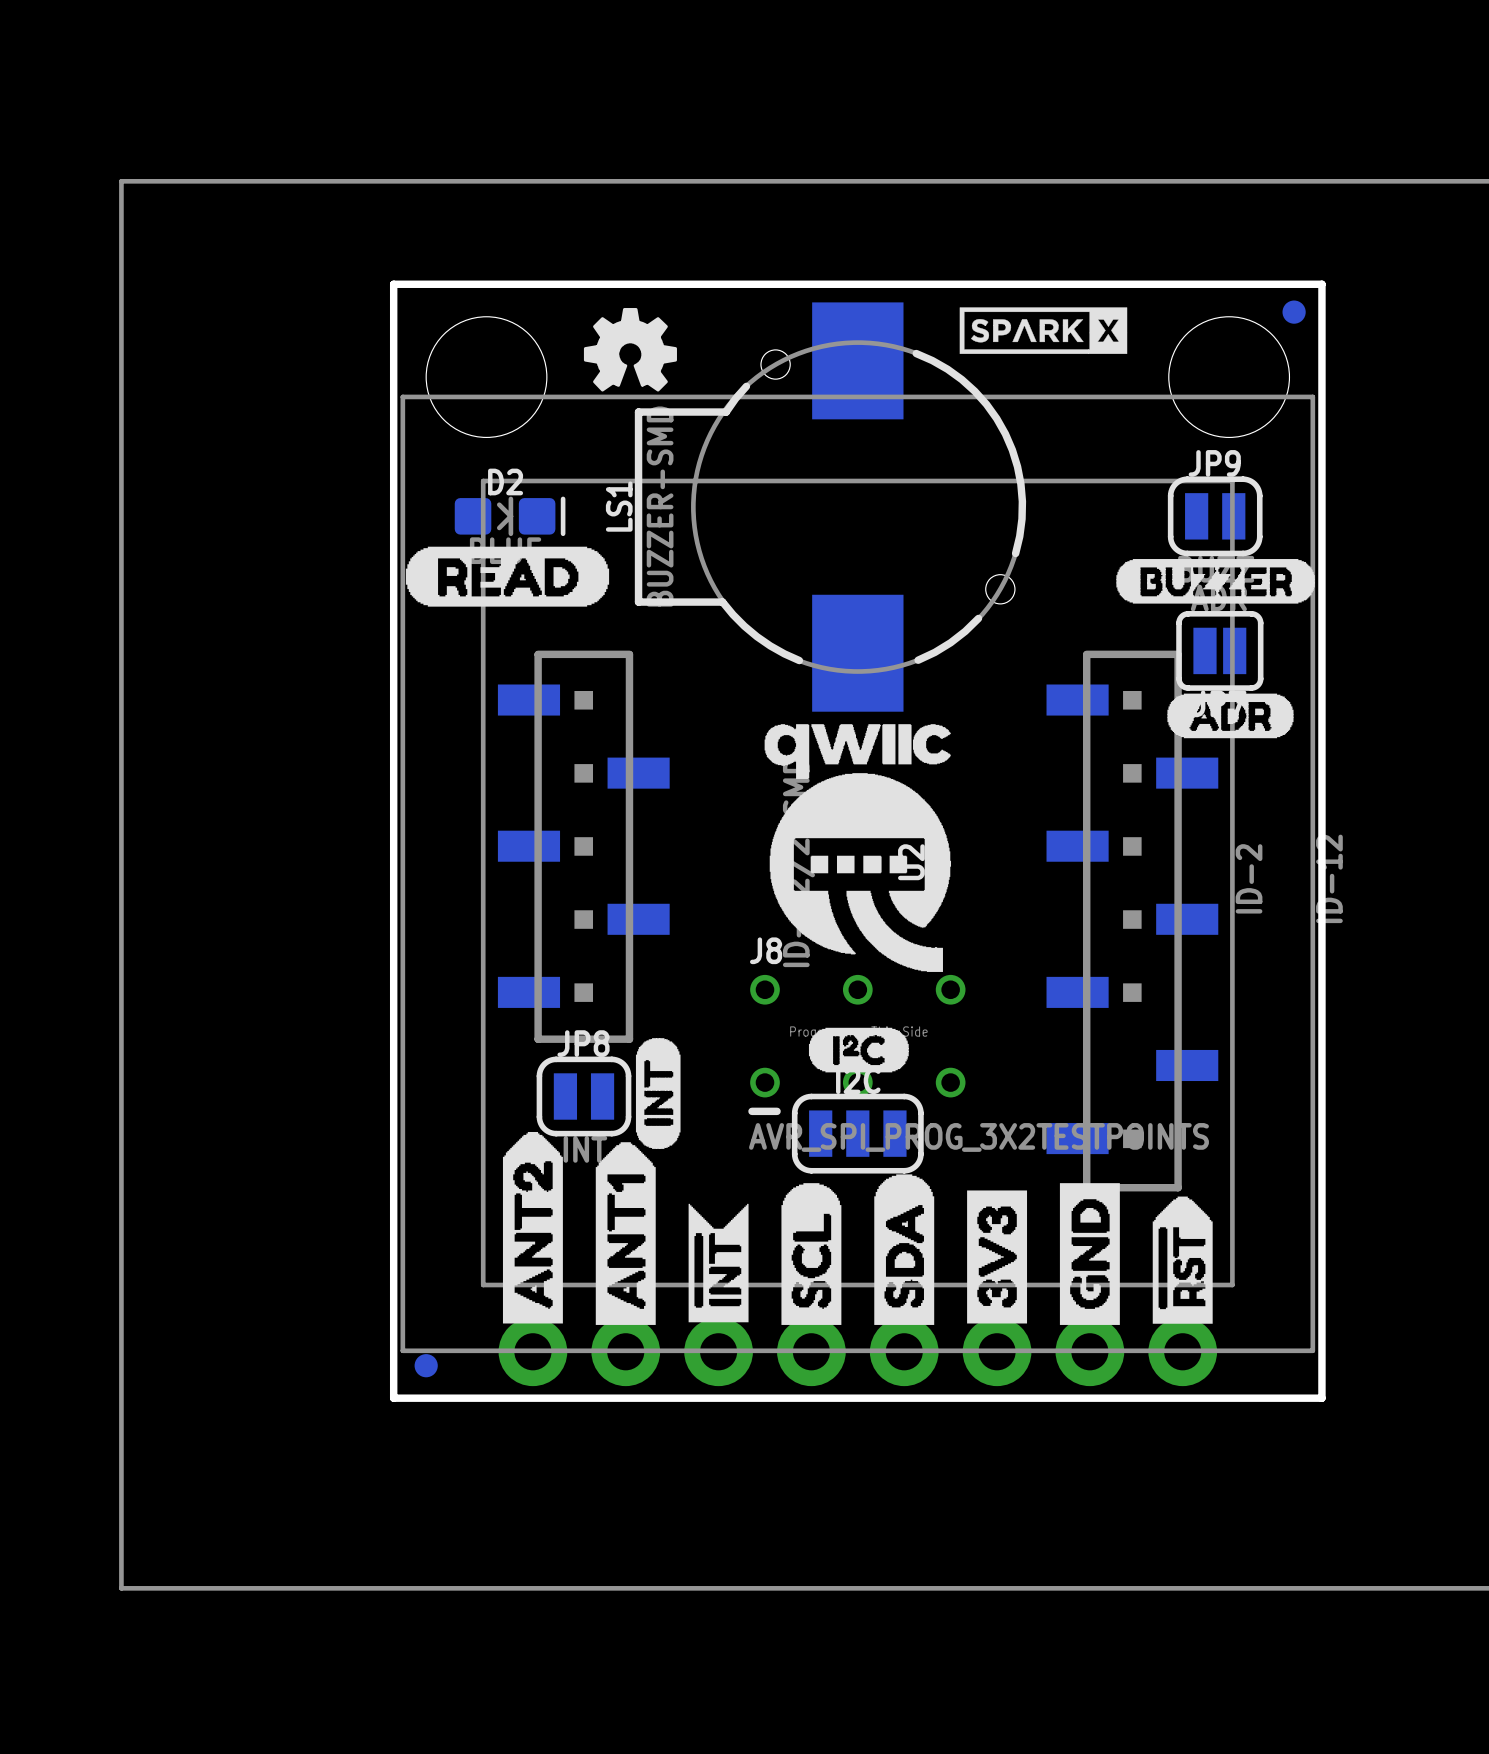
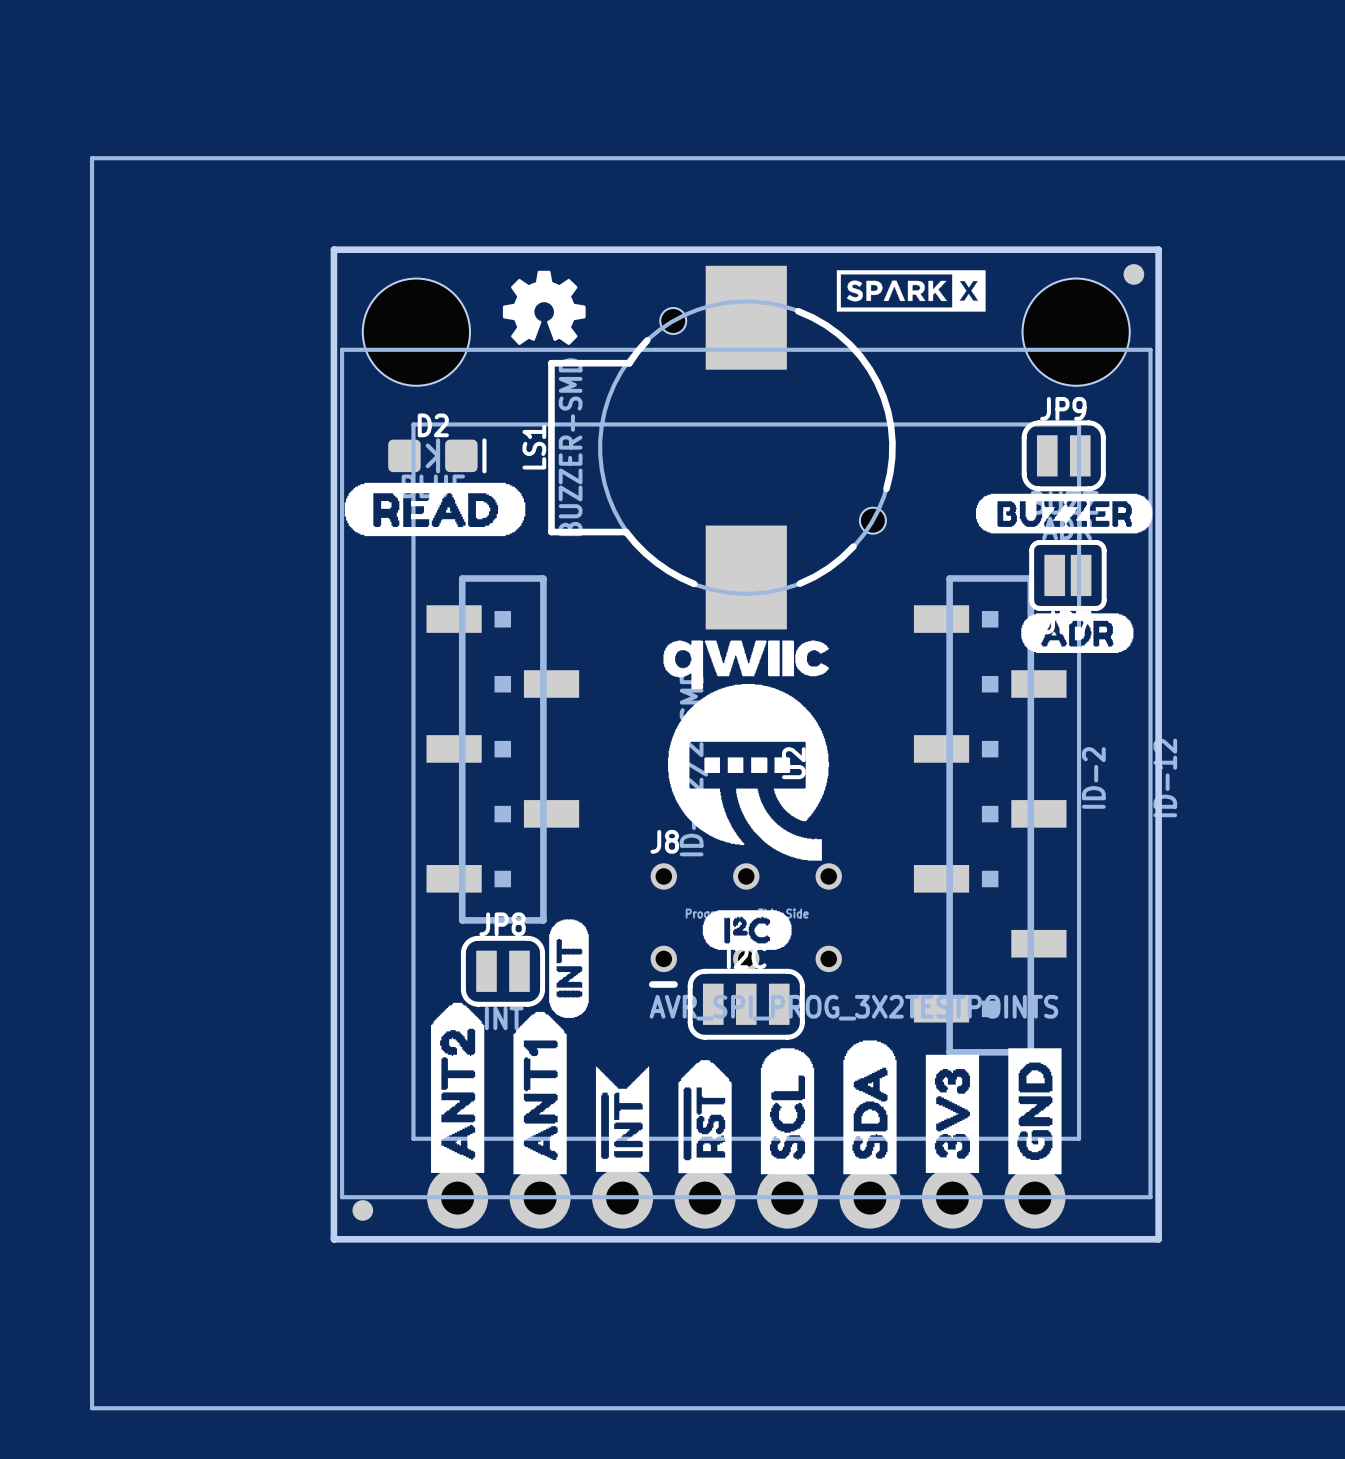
drawing position: (904, 1249) -> (869, 1107)
drawing position: (811, 1254) -> (787, 1111)
drawing position: (1089, 1254) -> (1034, 1111)
drawing position: (997, 1256) -> (952, 1113)
drawing position: (1182, 1260) -> (705, 1116)
part position: (950, 1351) -> (911, 1198)
part position: (1182, 1351) -> (705, 1198)

